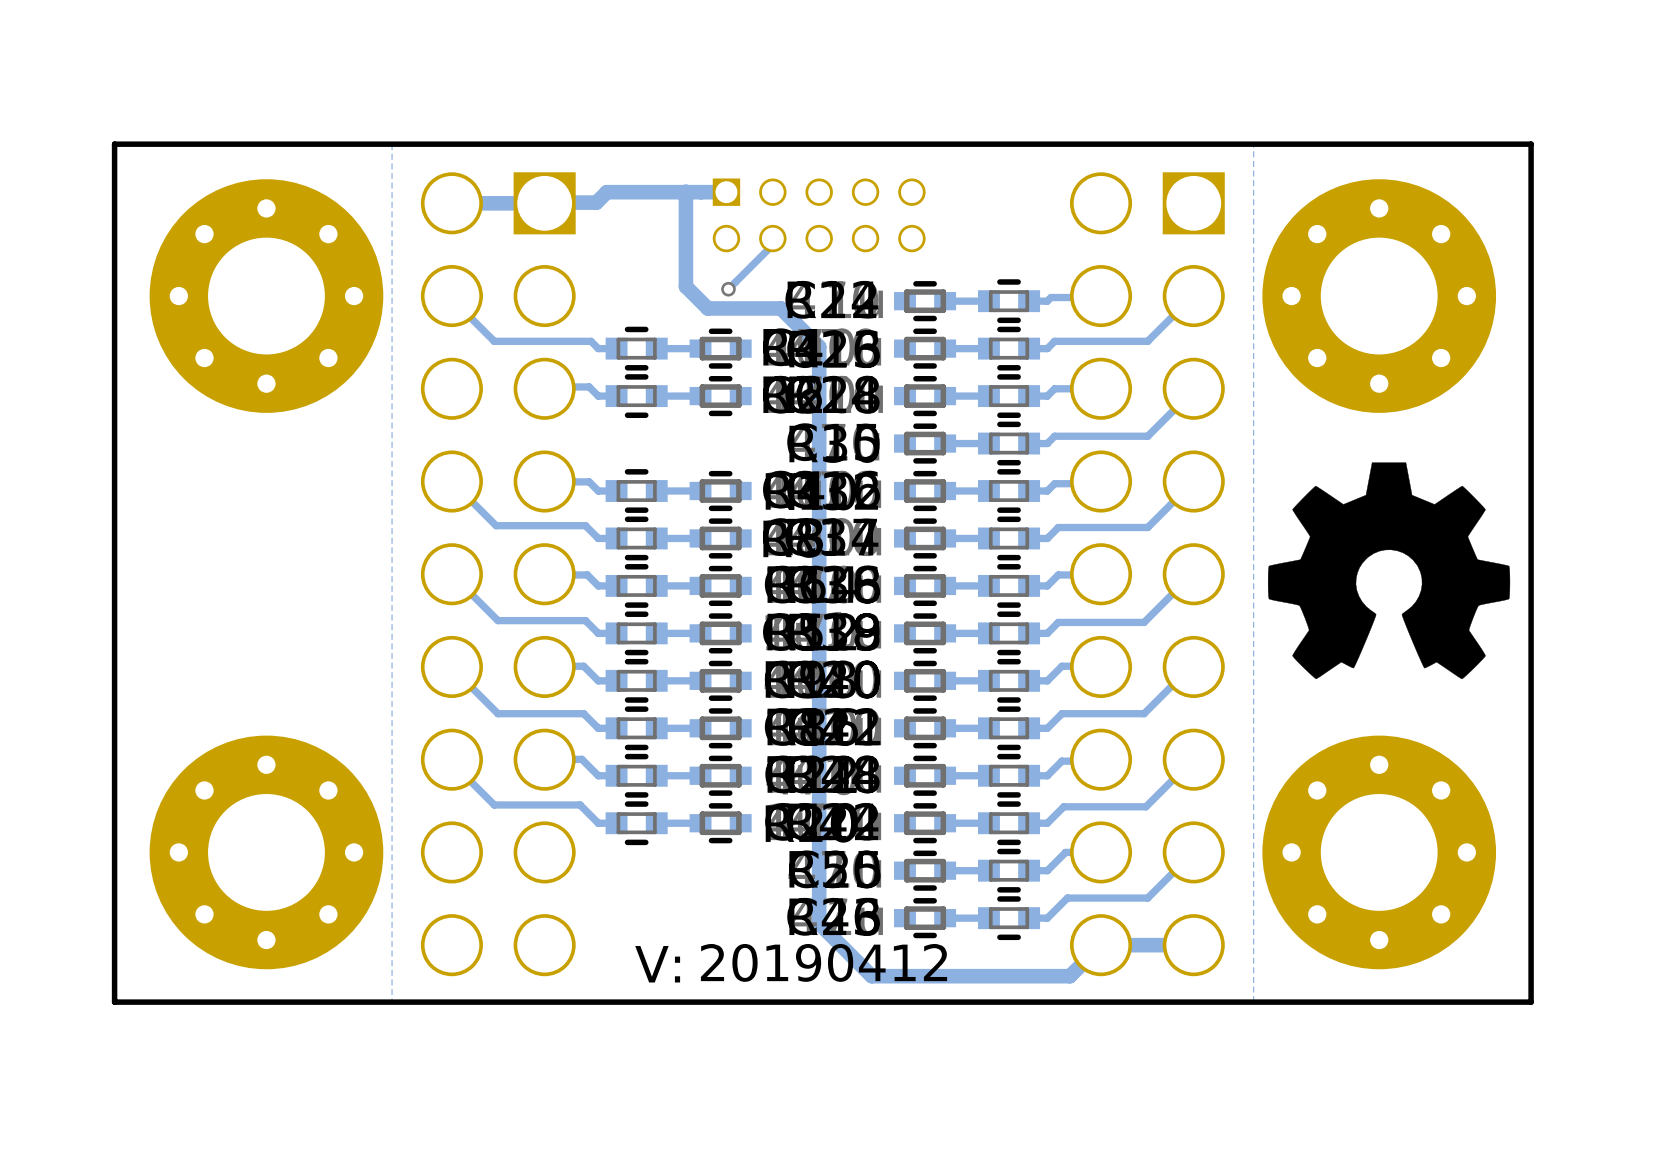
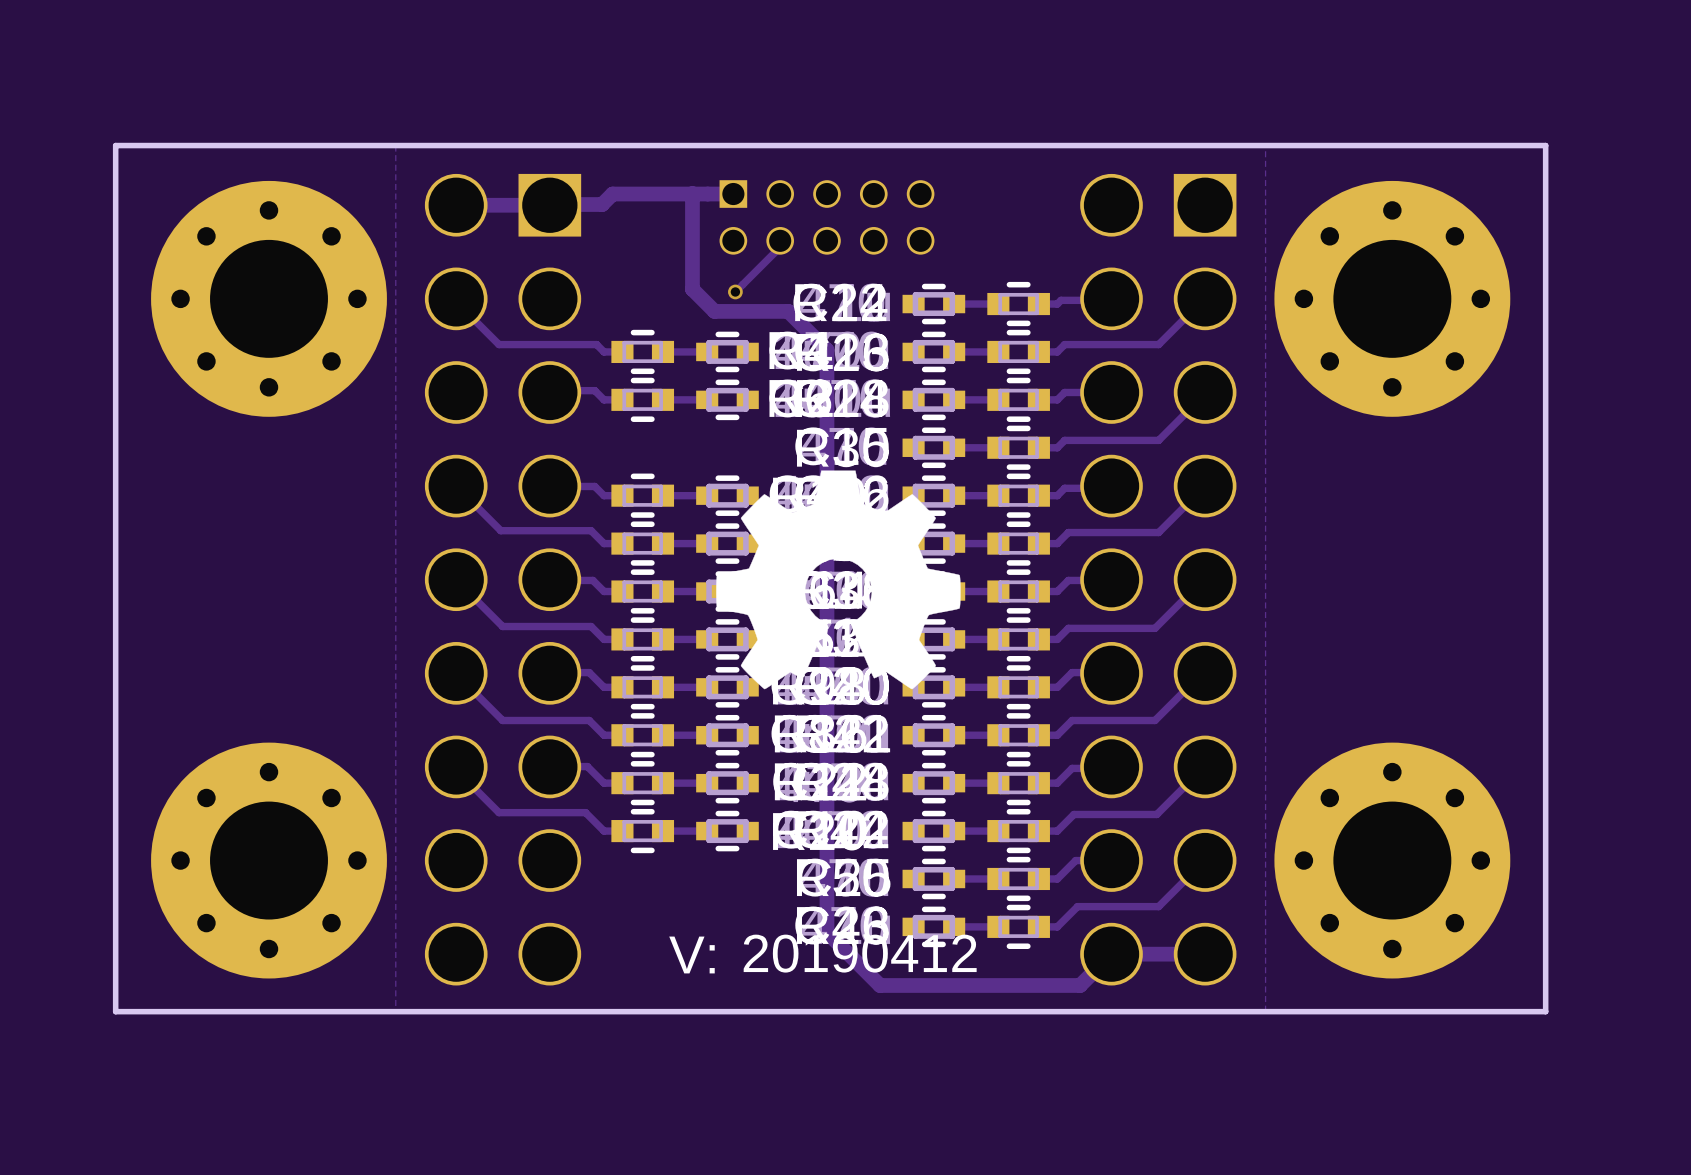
drawing position: (1389, 570) -> (838, 579)
drawing position: (791, 963) -> (822, 954)

